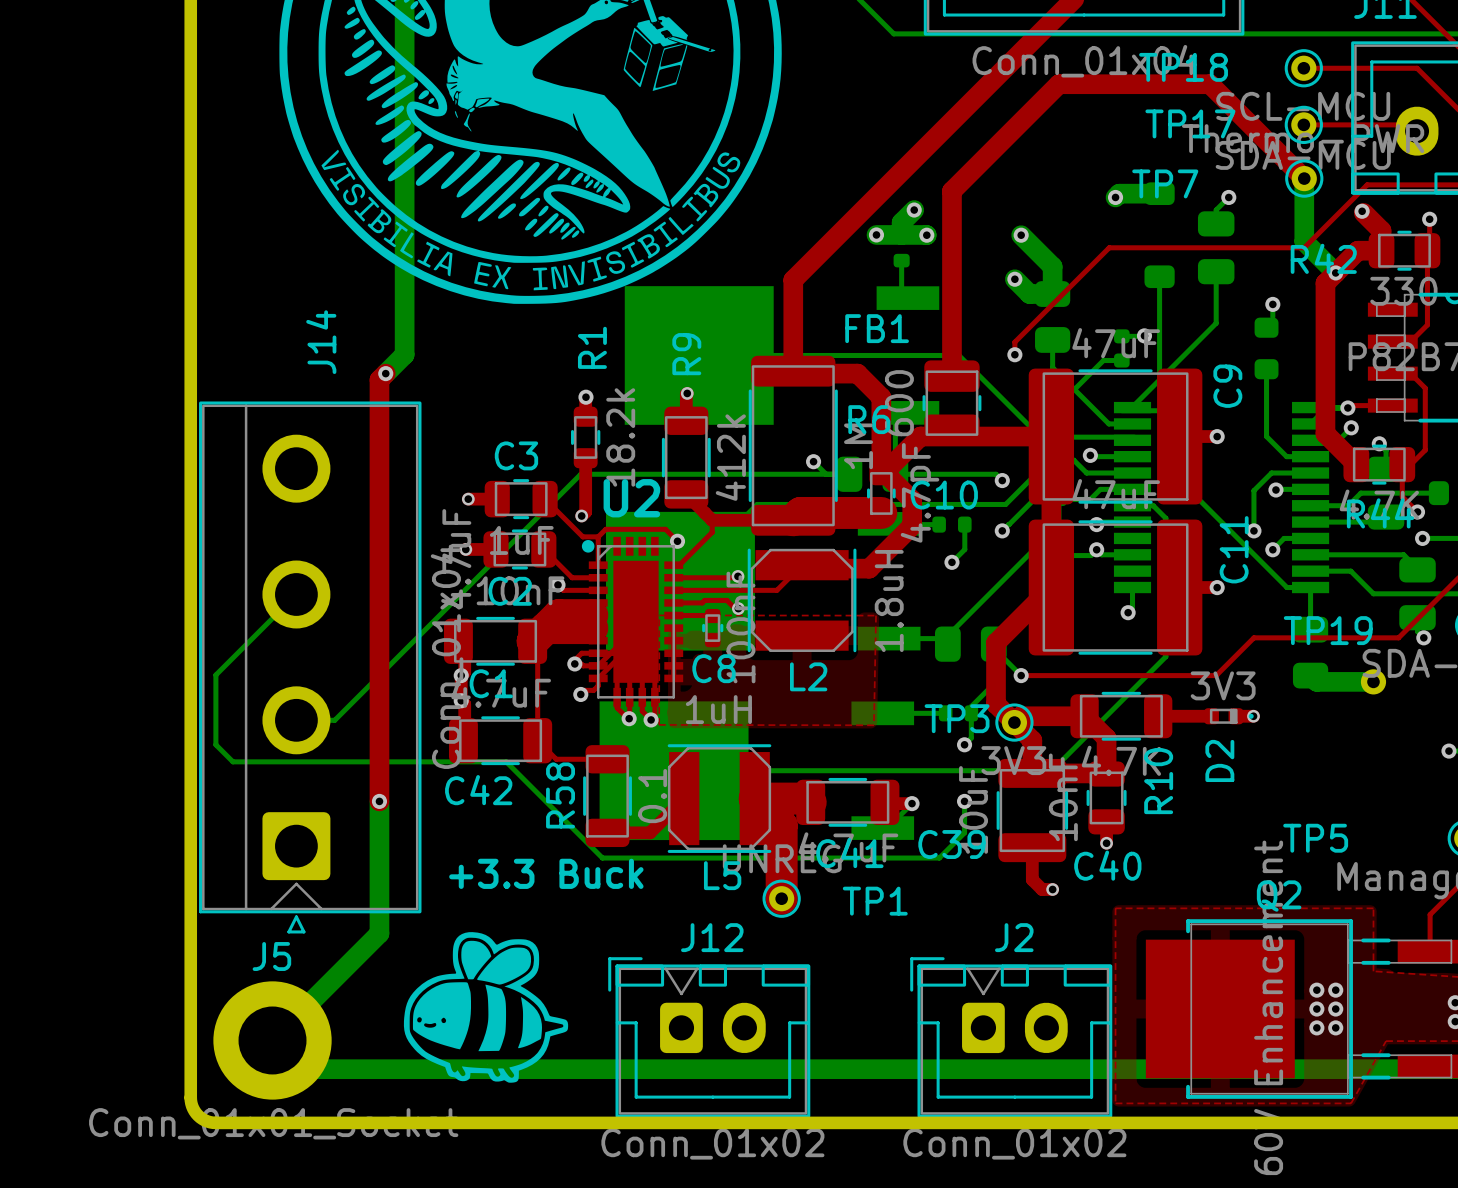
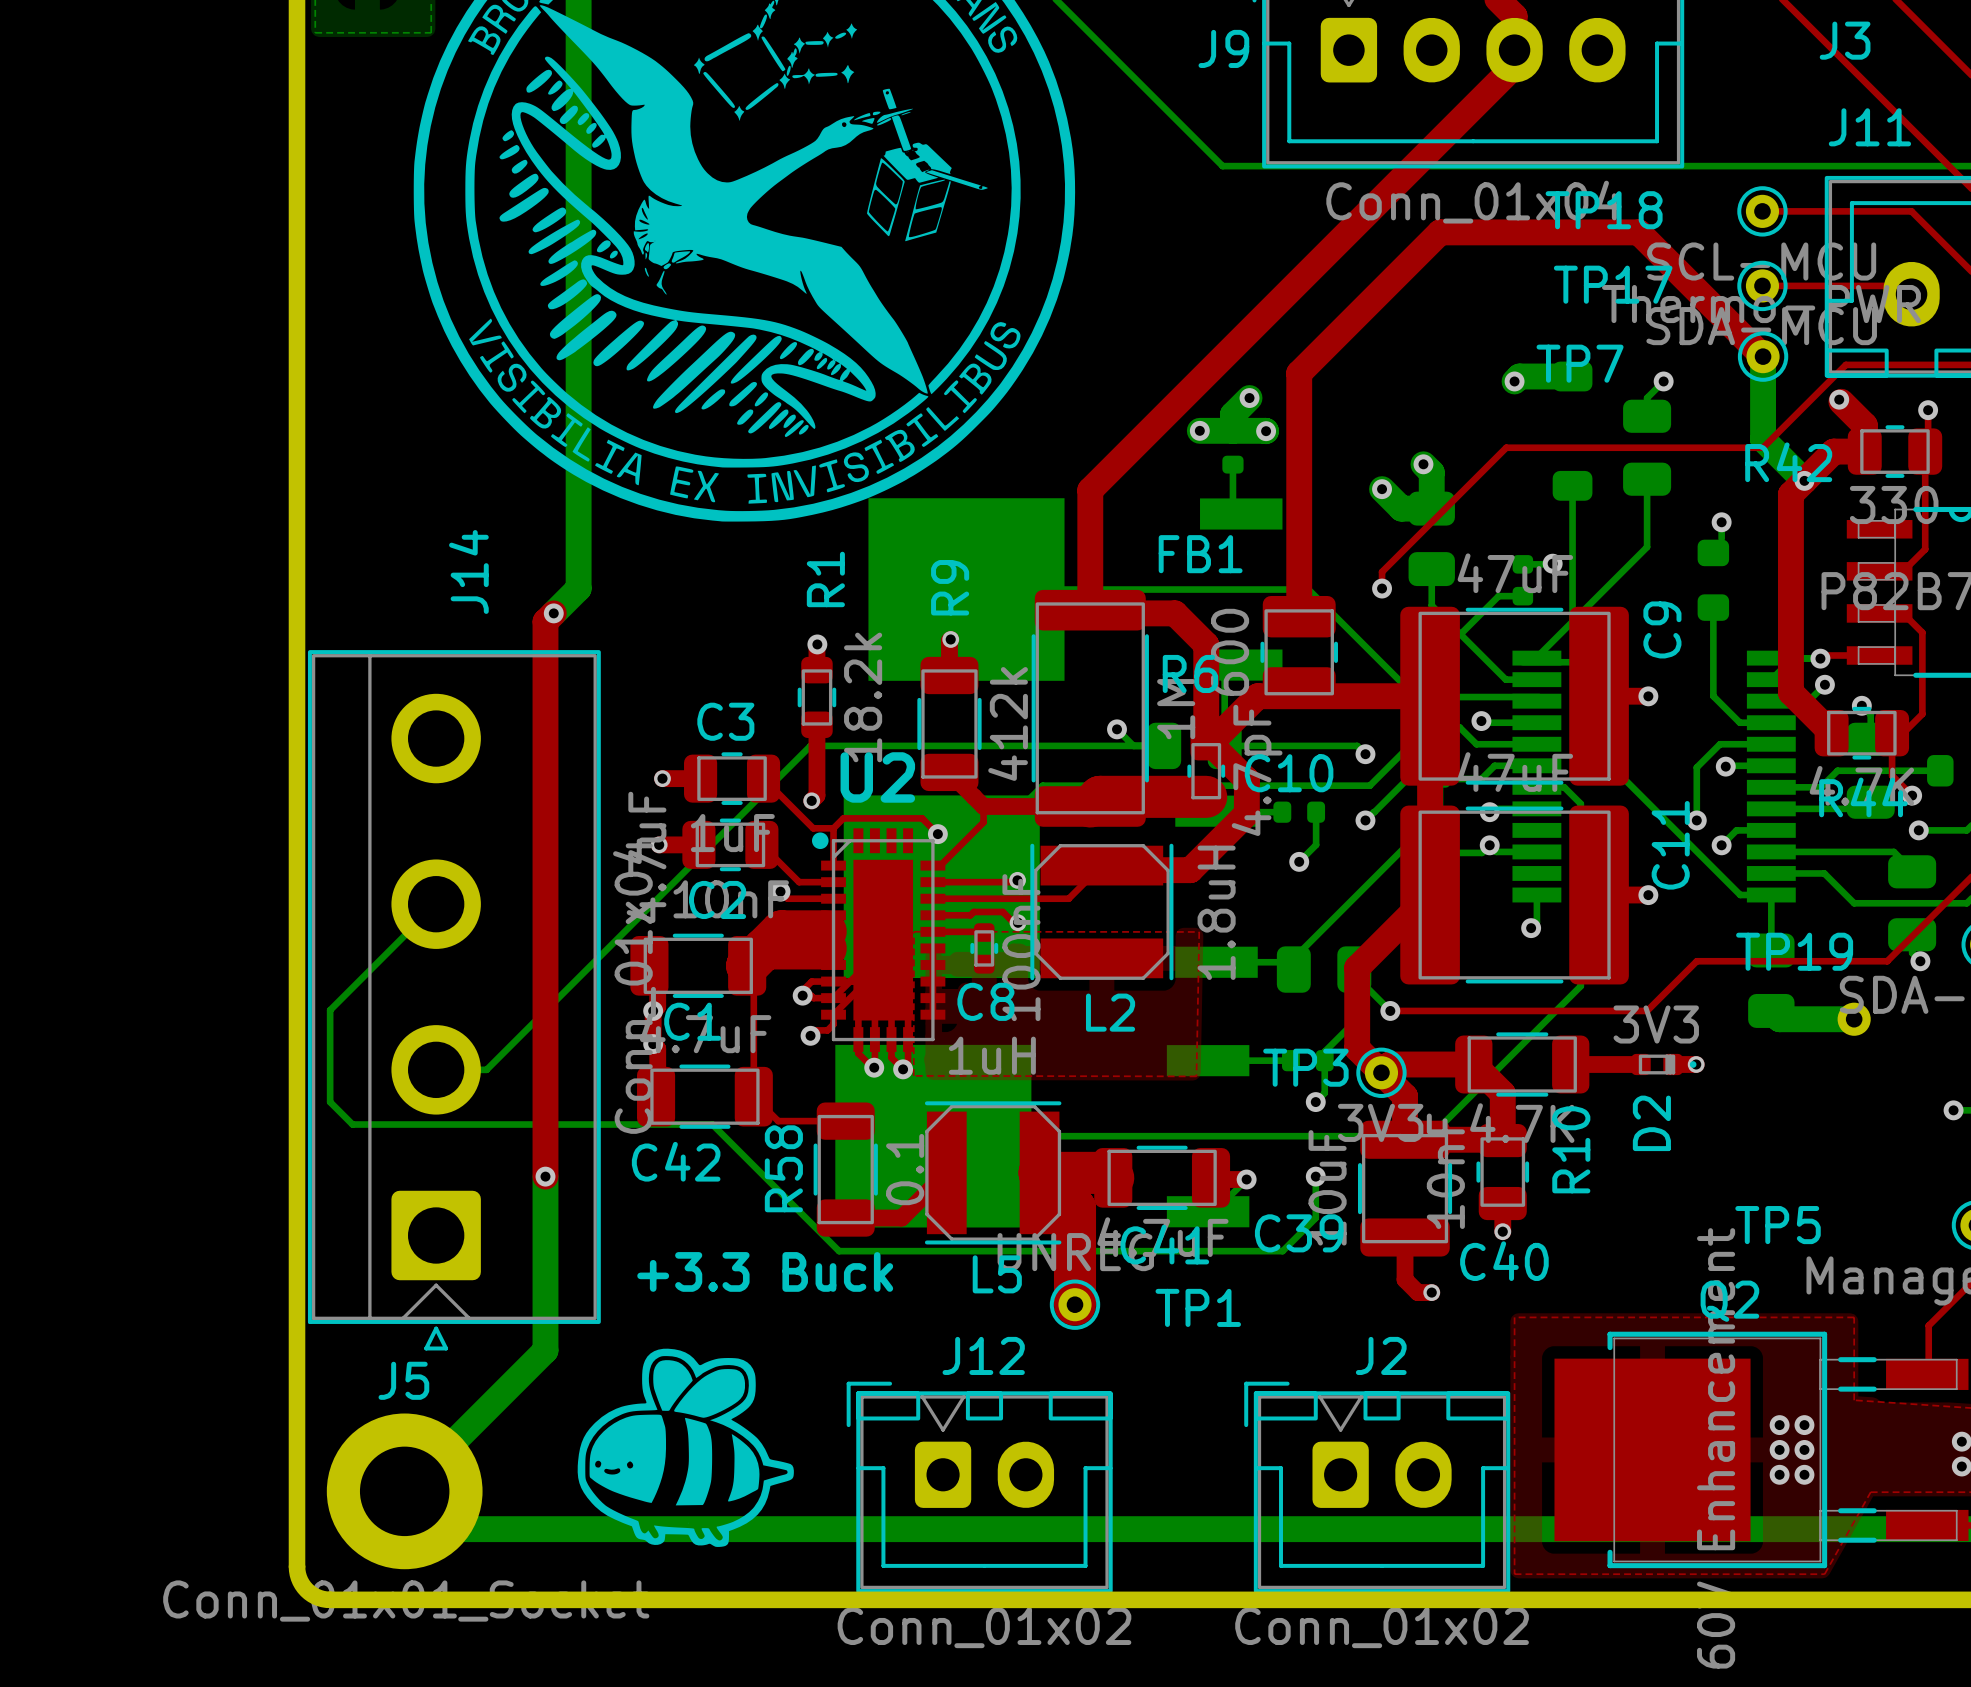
bottom track: (1021, 235) (1046, 260) -> none
via position: (1021, 235) -> (1423, 464)

